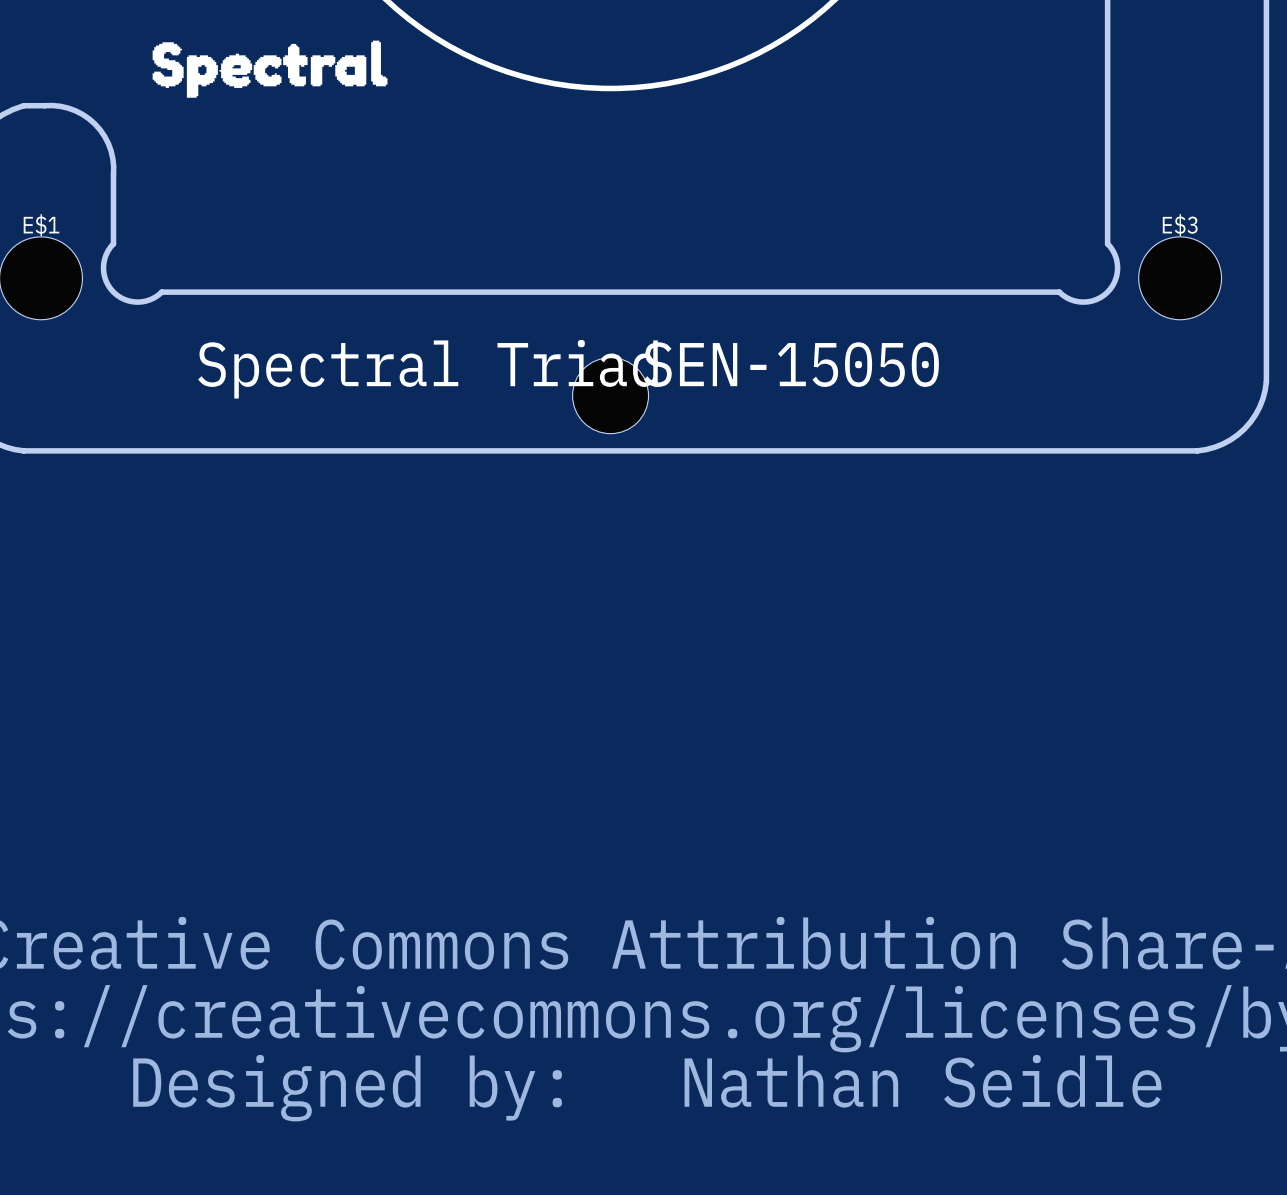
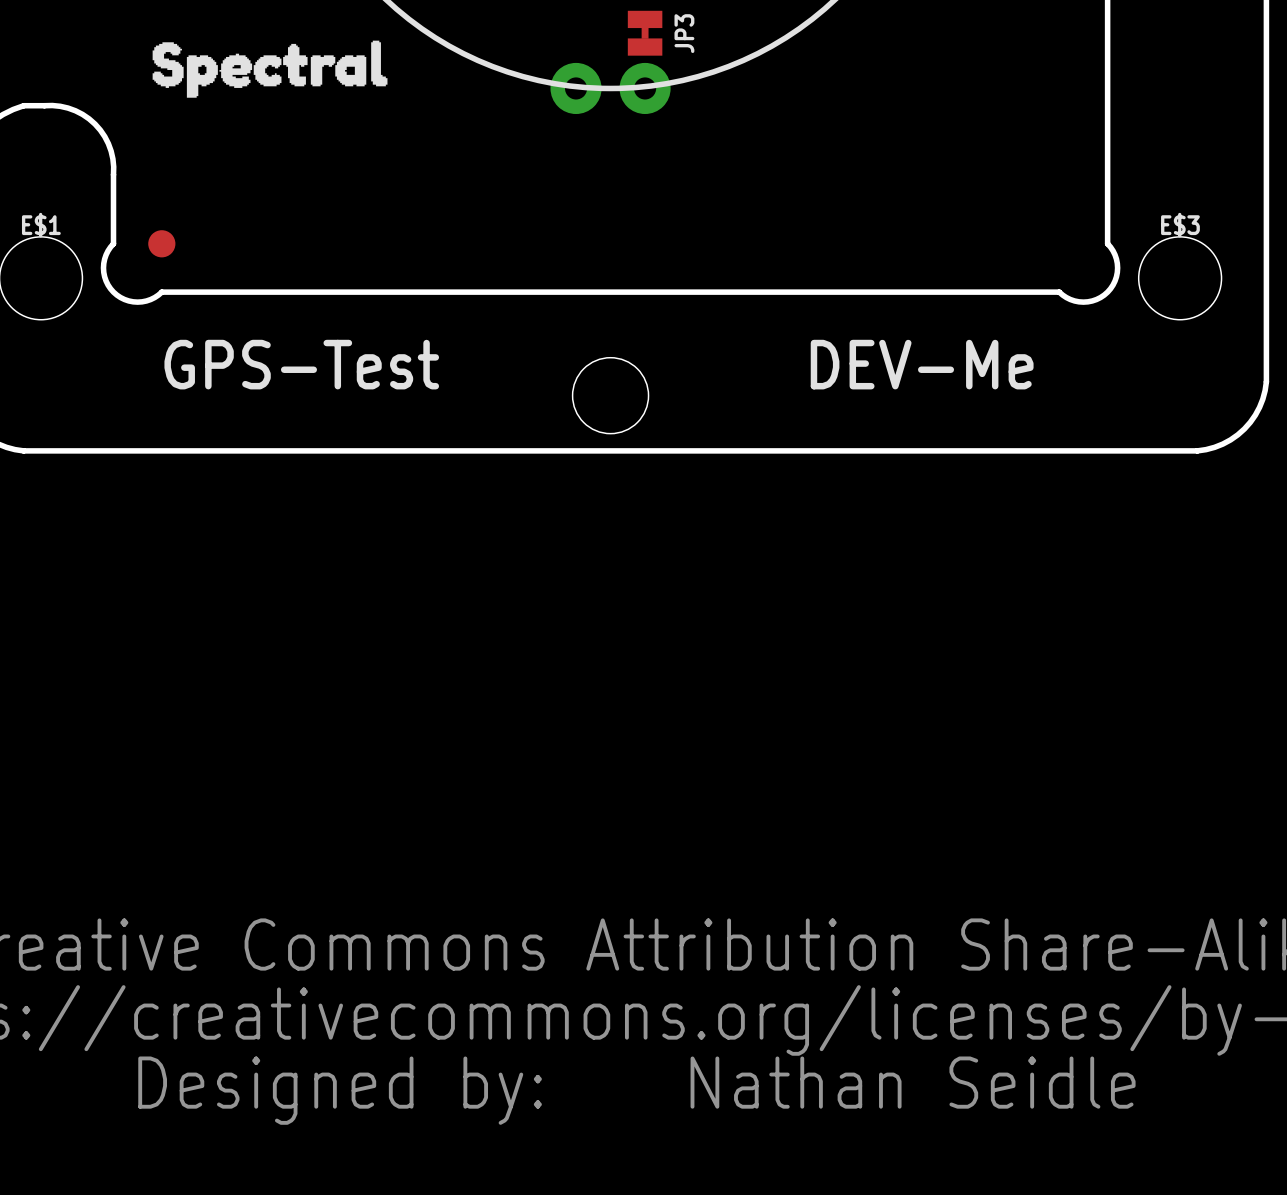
JP3: none -> (645, 33)
part: none -> (610, 88)
part: none -> (161, 243)
text: none -> GPS-Test (301, 364)
text: SEN-15050 (791, 364) -> none
text: none -> DEV-Me (922, 364)
text: Spectral Triad (427, 369) -> none

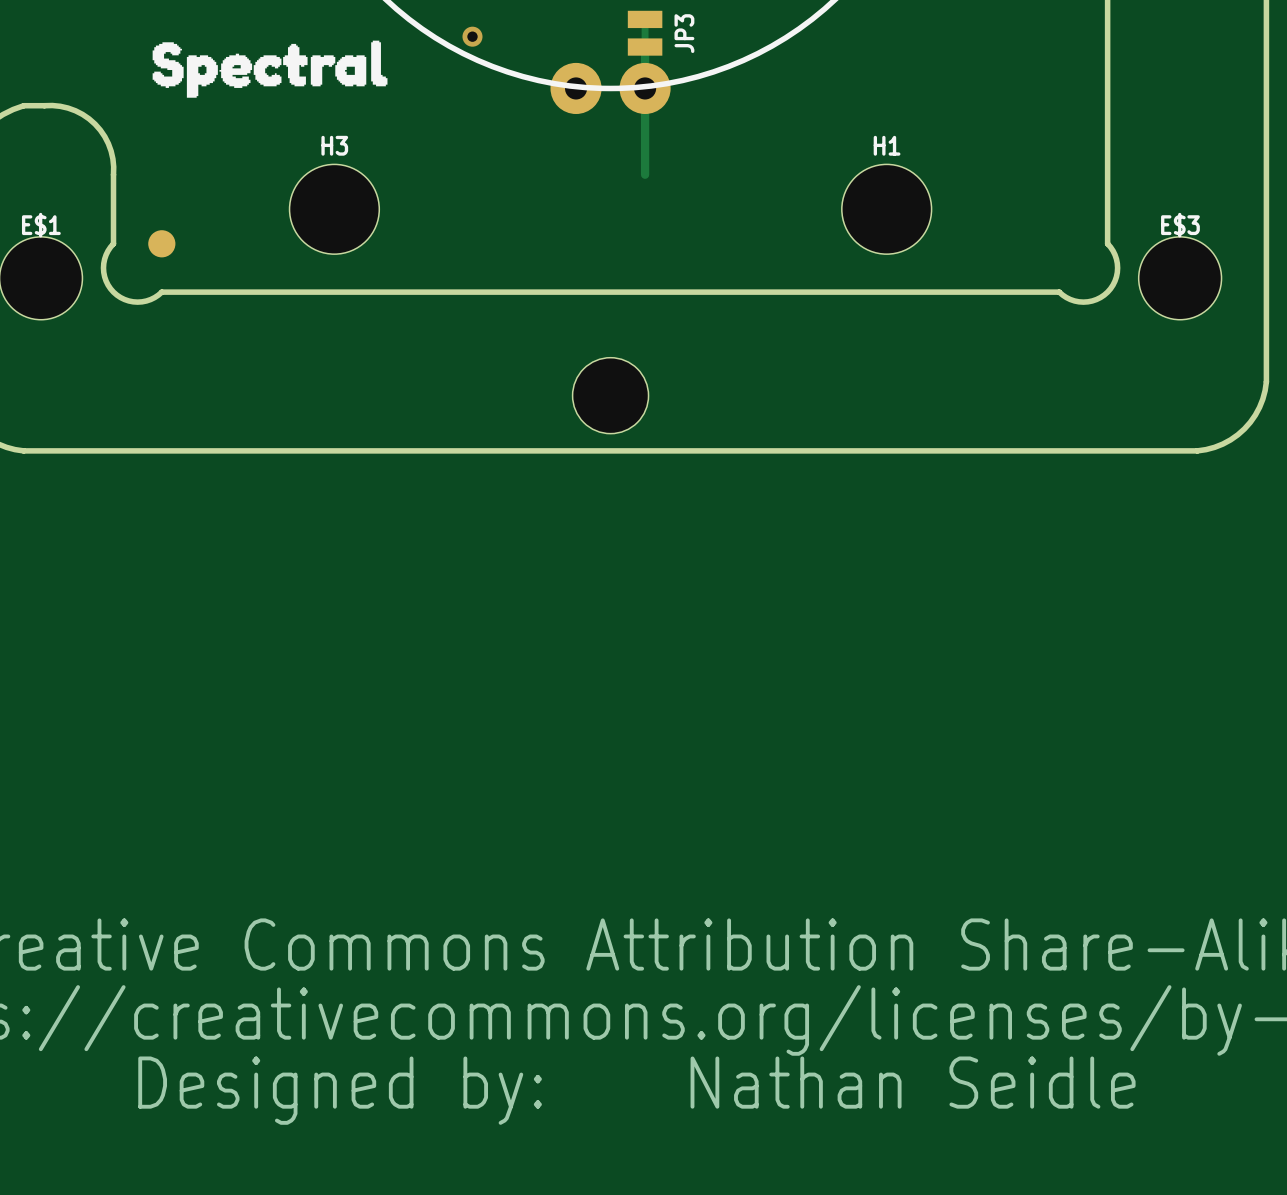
via: none -> (472, 36)
track: none -> (645, 47) (645, 174)
H3: none -> (334, 209)
H1: none -> (886, 209)
text: GPS-Test (301, 364) -> none
text: DEV-Me (922, 364) -> none

